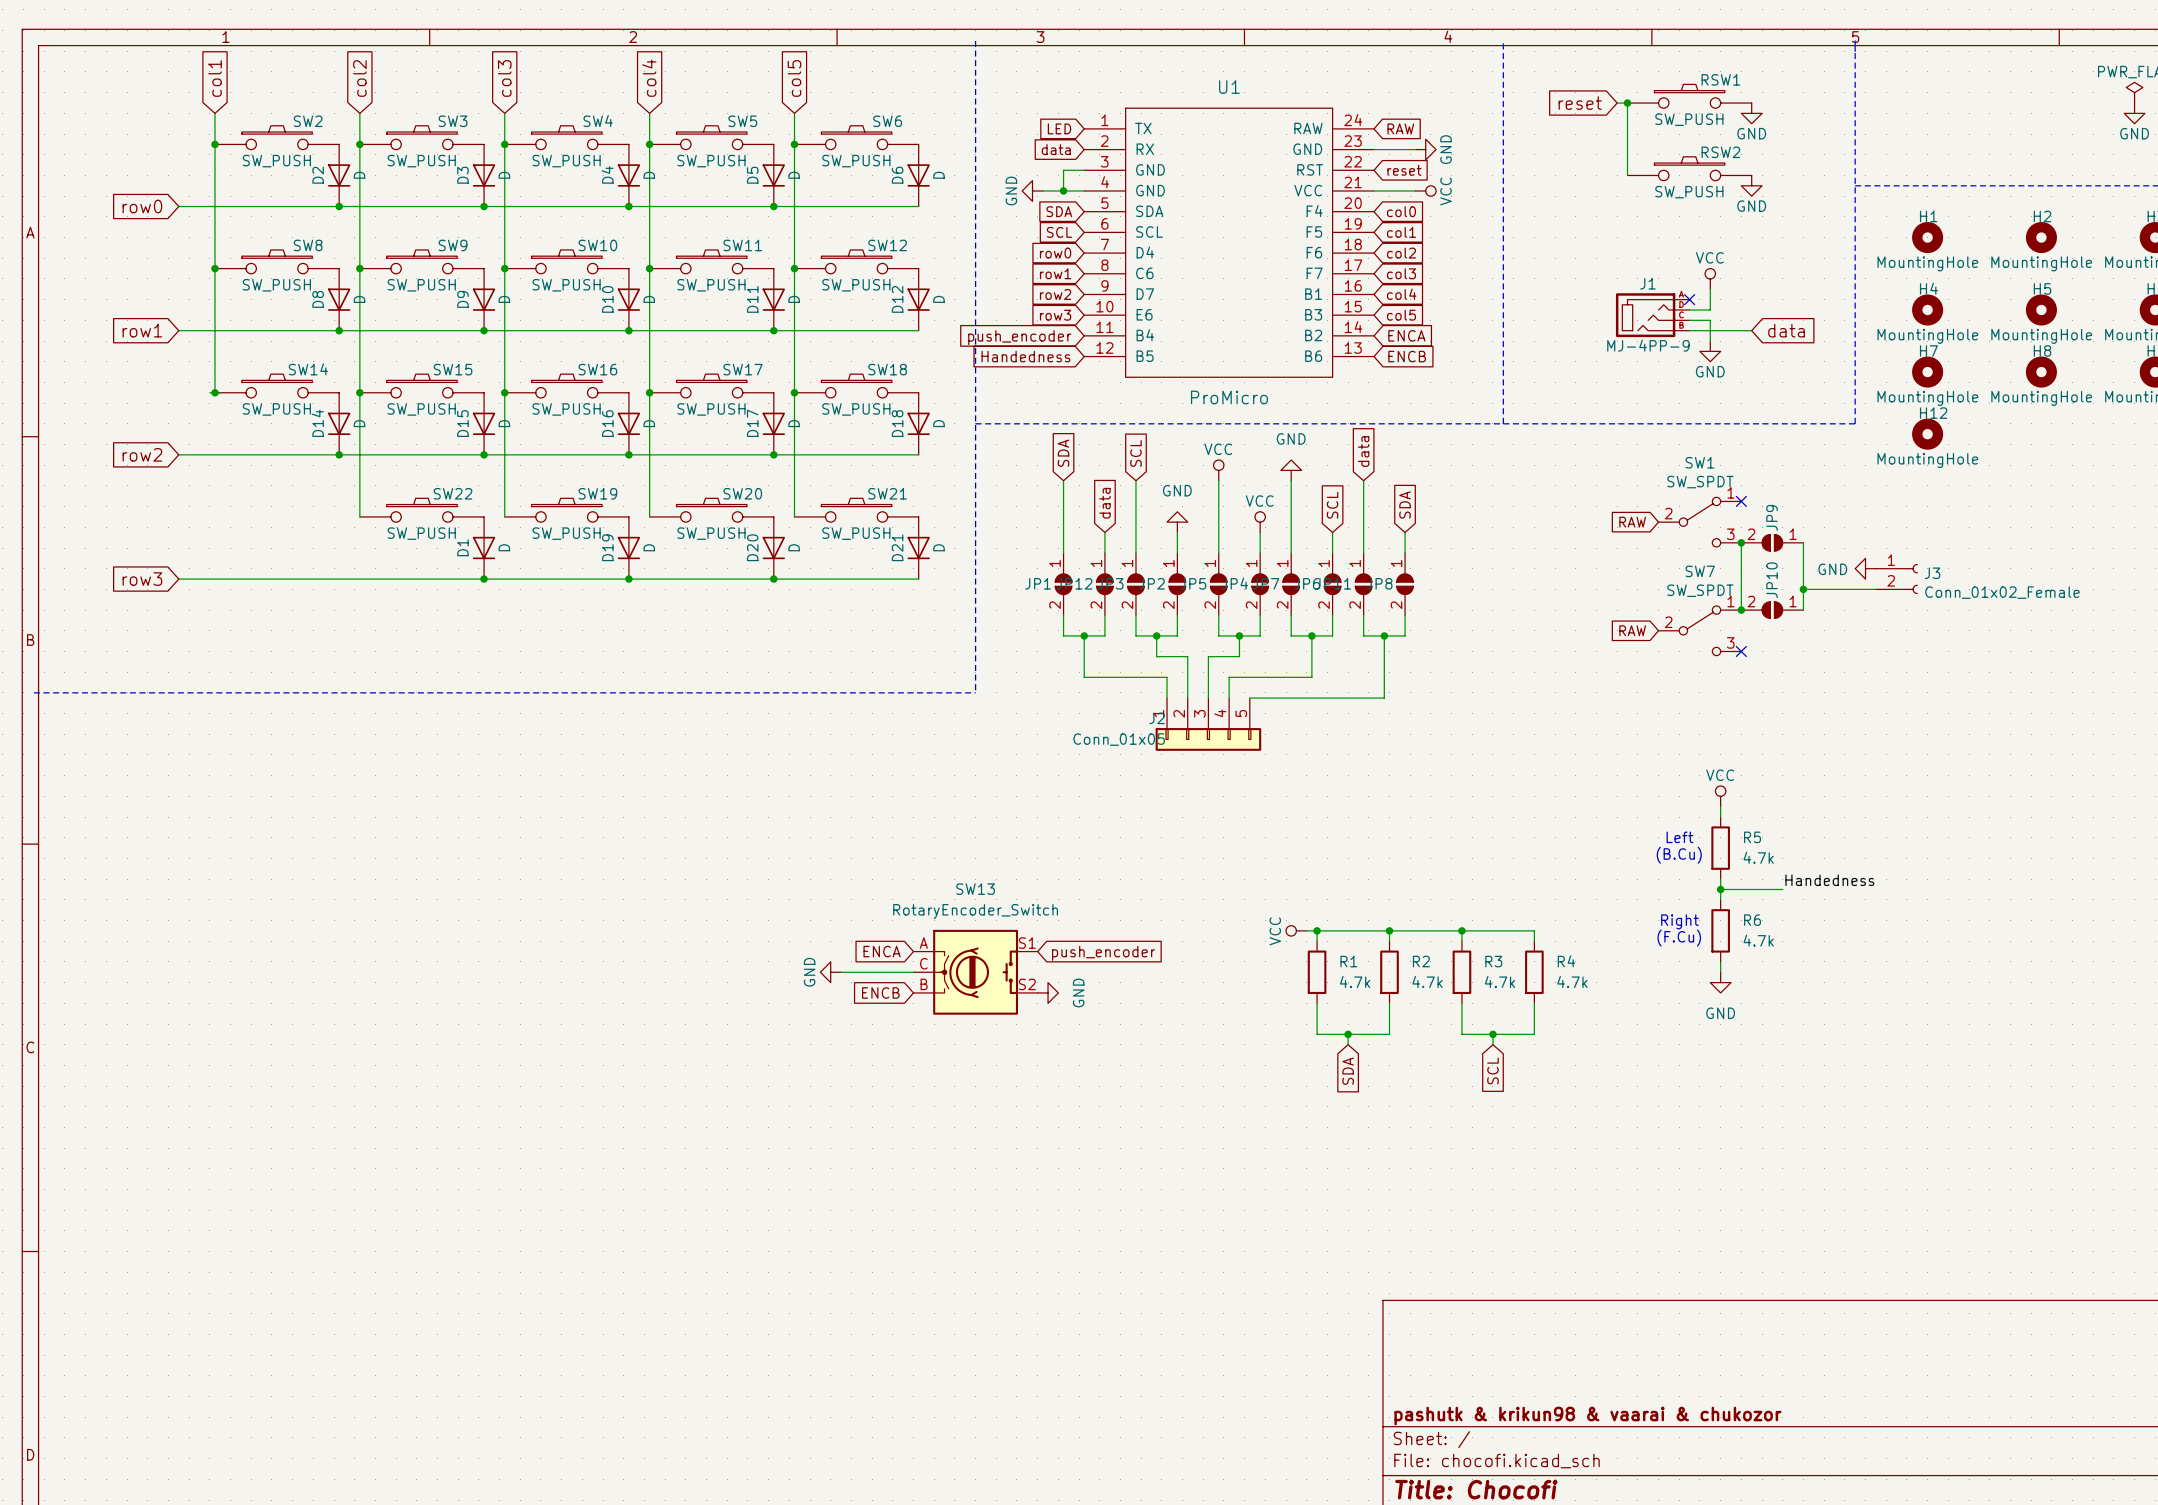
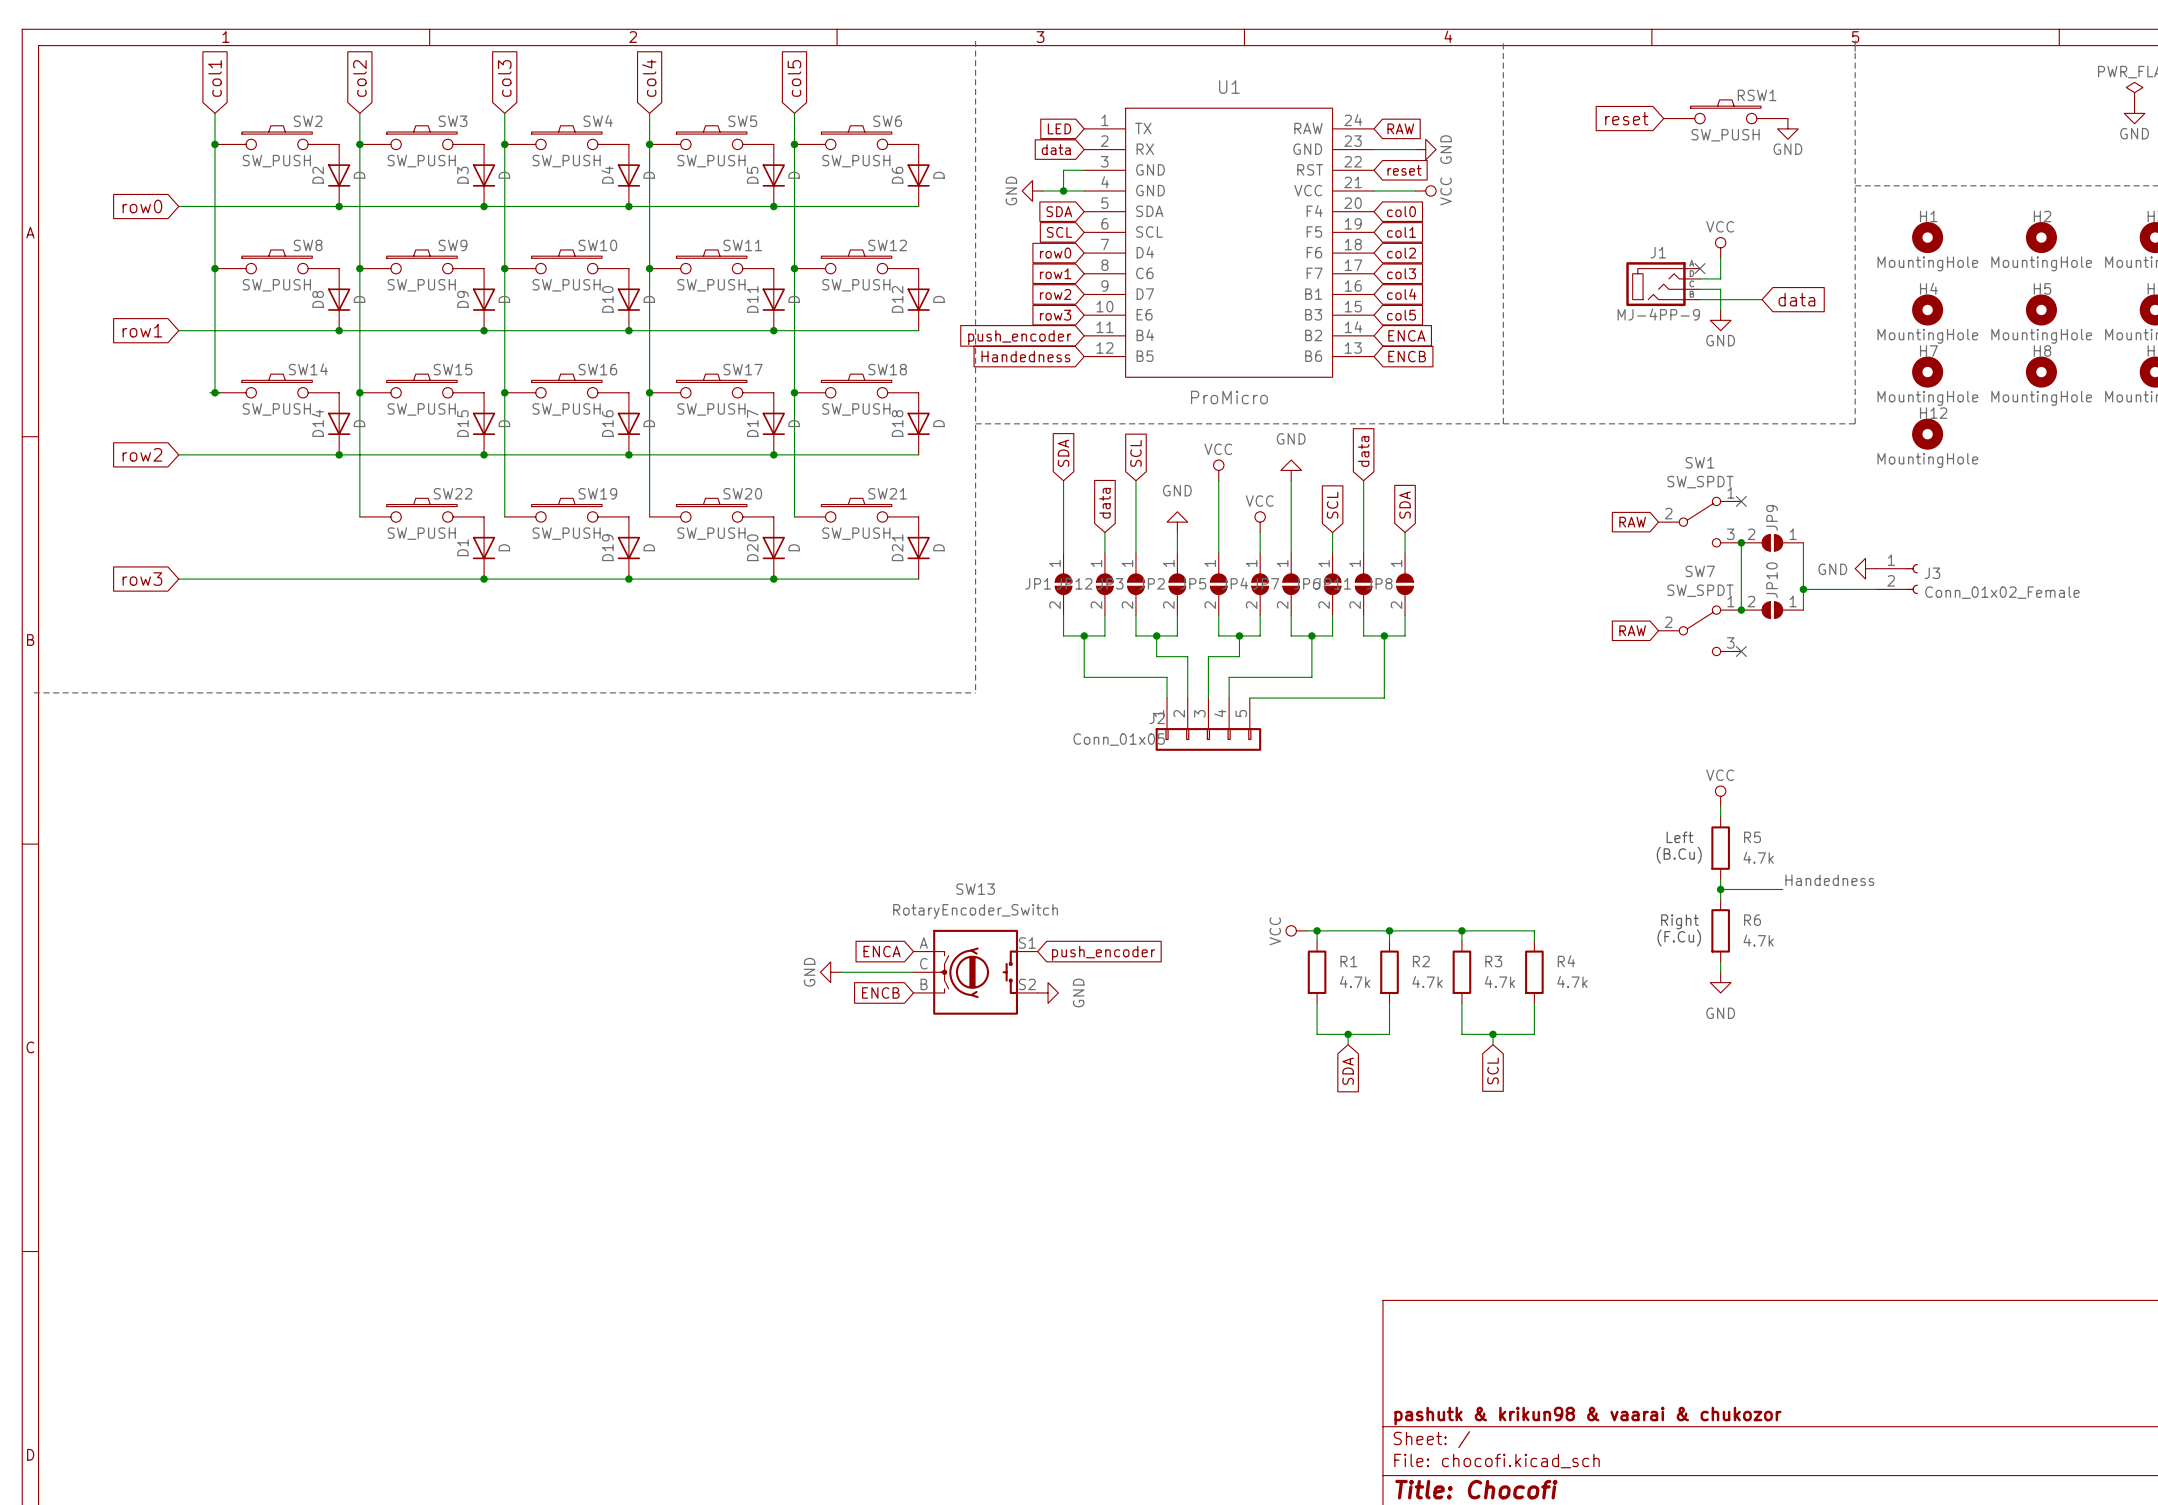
RSW1 position: (1689, 96) -> (1725, 111)
global label position: reset (1580, 103) -> reset (1626, 118)
wire: (1617, 103) (1627, 103) (1627, 175) -> none
junction: (1627, 103) -> none
power symbol: GND (1751, 113) -> none
power symbol: none -> GND (1787, 128)
RSW2: SW_PUSH (1689, 168) -> none
power symbol: GND (1751, 185) -> none
power symbol position: VCC (1710, 278) -> VCC (1720, 247)
wire: (1710, 289) (1710, 309) (1689, 309) -> (1720, 258) (1720, 278) (1699, 278)
no-connect mark position: (1689, 299) -> (1699, 268)
J1 position: (1652, 315) -> (1663, 284)
wire: (1689, 320) (1710, 320) (1710, 341) -> (1699, 289) (1720, 289) (1720, 309)
wire: (1689, 330) (1751, 330) -> (1699, 299) (1762, 299)
global label position: data (1786, 330) -> data (1796, 299)
power symbol position: GND (1710, 351) -> GND (1720, 320)

